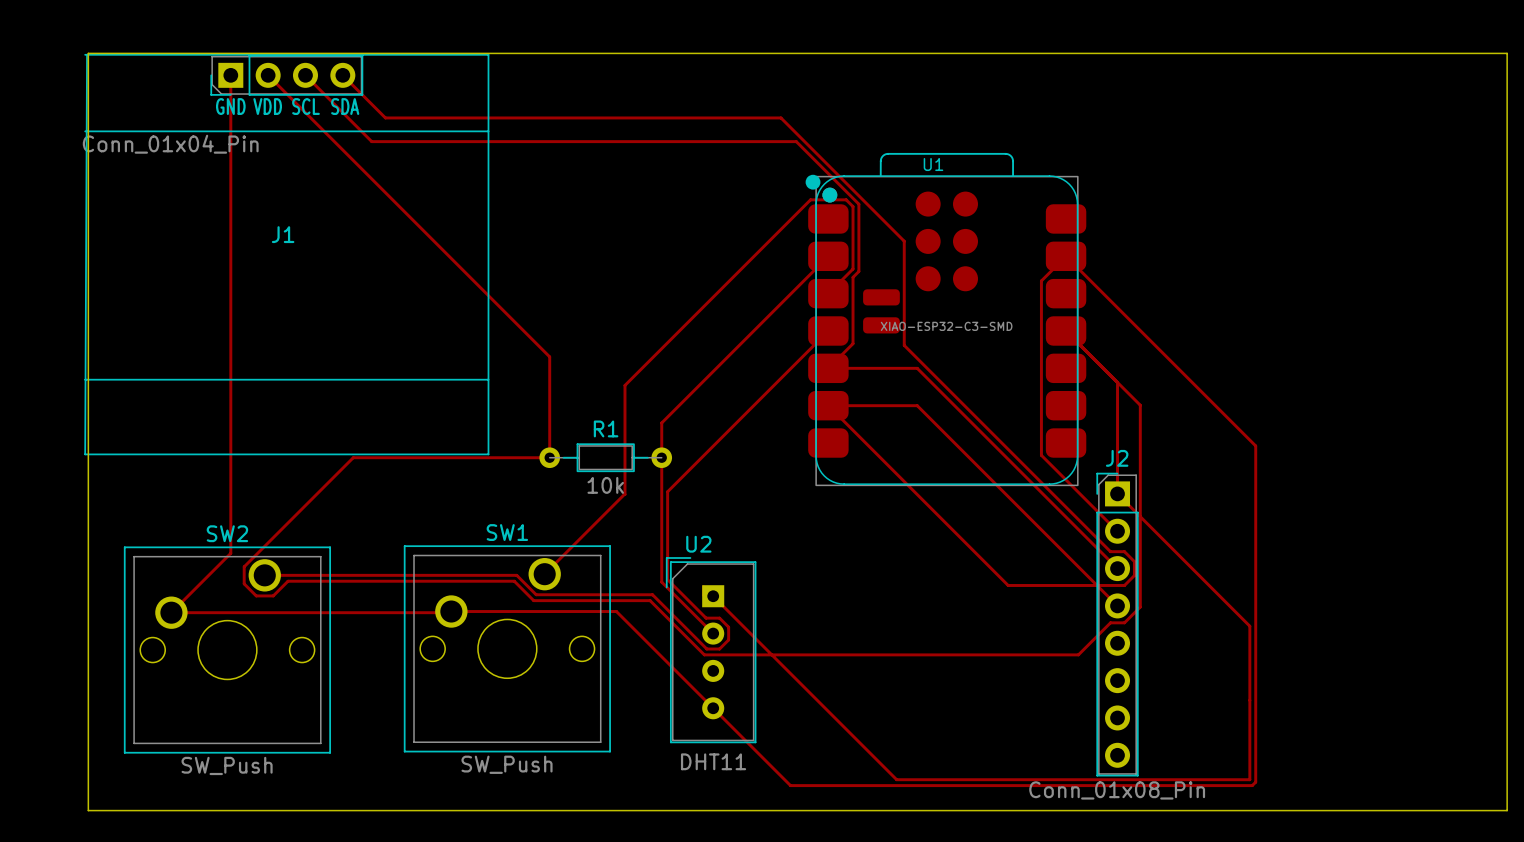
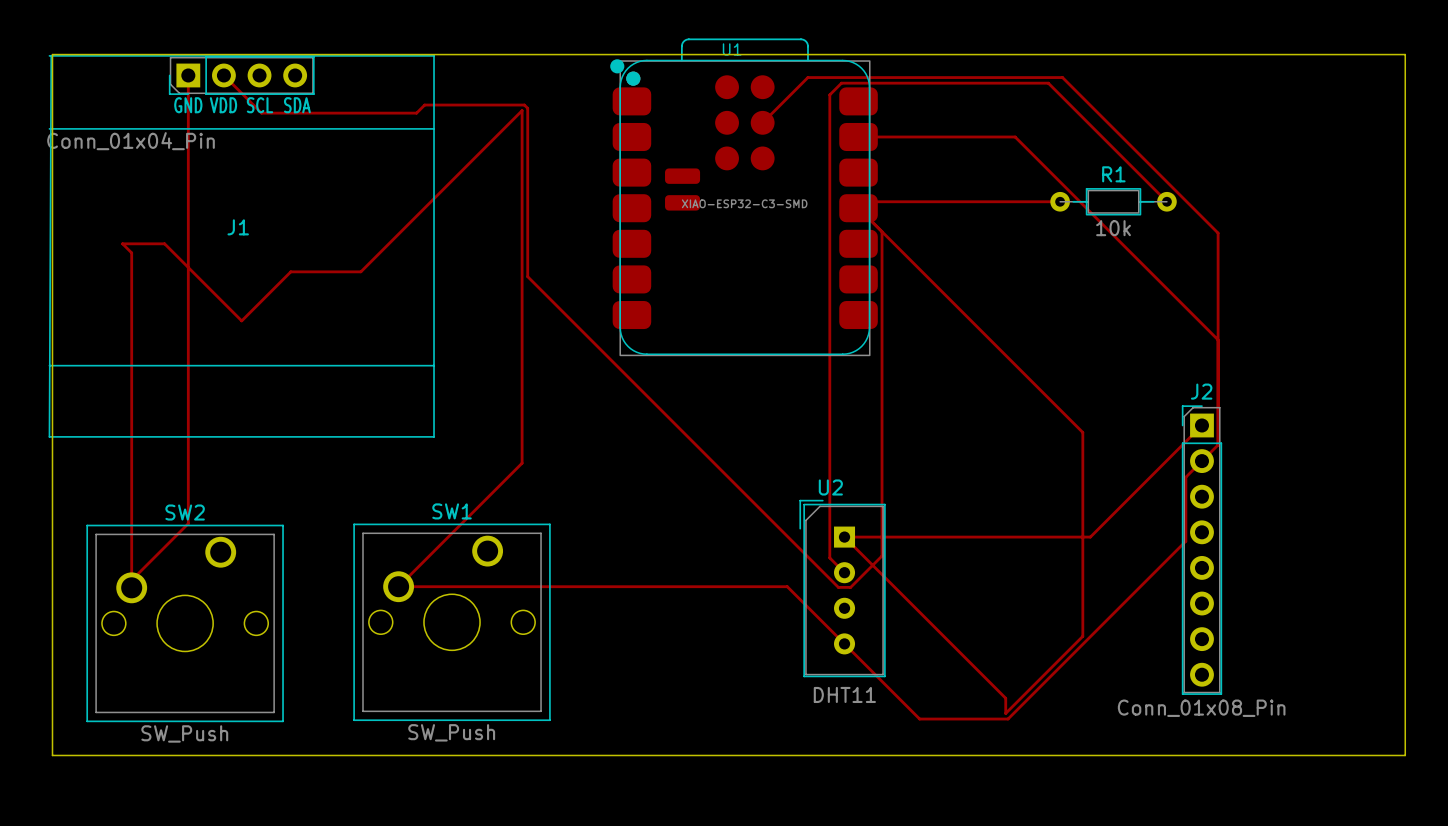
top track: (305, 75) (371, 141) (796, 141) (858, 204) (858, 271) (853, 277) (853, 343) (828, 368) (917, 368) (1117, 568) -> none
top track: (345, 75) (342, 75) (385, 117) (780, 117) (904, 241) (904, 345) (1110, 551) (1124, 551) (1134, 561) (1134, 575) (1124, 585) (1008, 585) (828, 405) (917, 405) (1117, 605) -> none
top track: (307, 114) (549, 356) (549, 457) -> (261, 113) (416, 113) (424, 105) (524, 105) (527, 108) (527, 276) (838, 587) (850, 587) (882, 556) (882, 231)
top track: none -> (858, 137) (1015, 137) (1218, 339)
top track: none -> (1060, 201) (864, 201) (858, 208) (1082, 432) (1082, 636) (1005, 713) (1005, 698) (844, 537) (1090, 537) (1201, 425)
top track: none -> (1166, 201) (1048, 83) (841, 83) (829, 94) (829, 557) (844, 572)
top track: (828, 256) (661, 422) (661, 582) (713, 633) -> none
top track: (828, 293) (853, 269) (853, 206) (846, 199) (810, 199) (624, 385) (624, 494) (544, 574) -> none
U1 position: (945, 319) -> (744, 197)
top track: (828, 330) (667, 491) (667, 579) (706, 618) (719, 618) (728, 627) (728, 639) (719, 649) (706, 649) (652, 594) (536, 594) (516, 575) (264, 575) -> none
top track: (1066, 330) (1140, 405) (1140, 607) (1124, 622) (1110, 622) (1078, 654) (704, 654) (650, 600) (533, 600) (514, 581) (288, 581) (273, 595) (256, 595) (244, 583) (244, 566) (353, 457) (551, 457) -> none
top track: (1117, 382) (1117, 493) (1249, 626) (1249, 779) (896, 779) (713, 596) -> none
R1 position: (605, 457) -> (1113, 201)
top track: (1117, 531) (1041, 455) (1041, 280) (1066, 256) (1255, 445) (1255, 782) (1252, 785) (790, 785) (616, 611) -> (762, 122) (807, 77) (1062, 77) (1218, 233) (1218, 444) (1185, 477) (1185, 541) (1008, 719) (919, 719) (787, 586) (556, 586)
top track: (230, 545) (230, 553) (171, 612) (451, 611) -> (188, 523) (131, 580) (131, 252) (122, 243) (164, 243) (241, 320) (290, 271) (360, 271) (522, 110) (522, 463) (398, 586)
J2 position: (1117, 624) -> (1201, 550)
U2 position: (711, 650) -> (842, 588)
board edge: (88, 788) (88, 810) (1507, 810) (1507, 788) -> (52, 755) (1405, 755)

